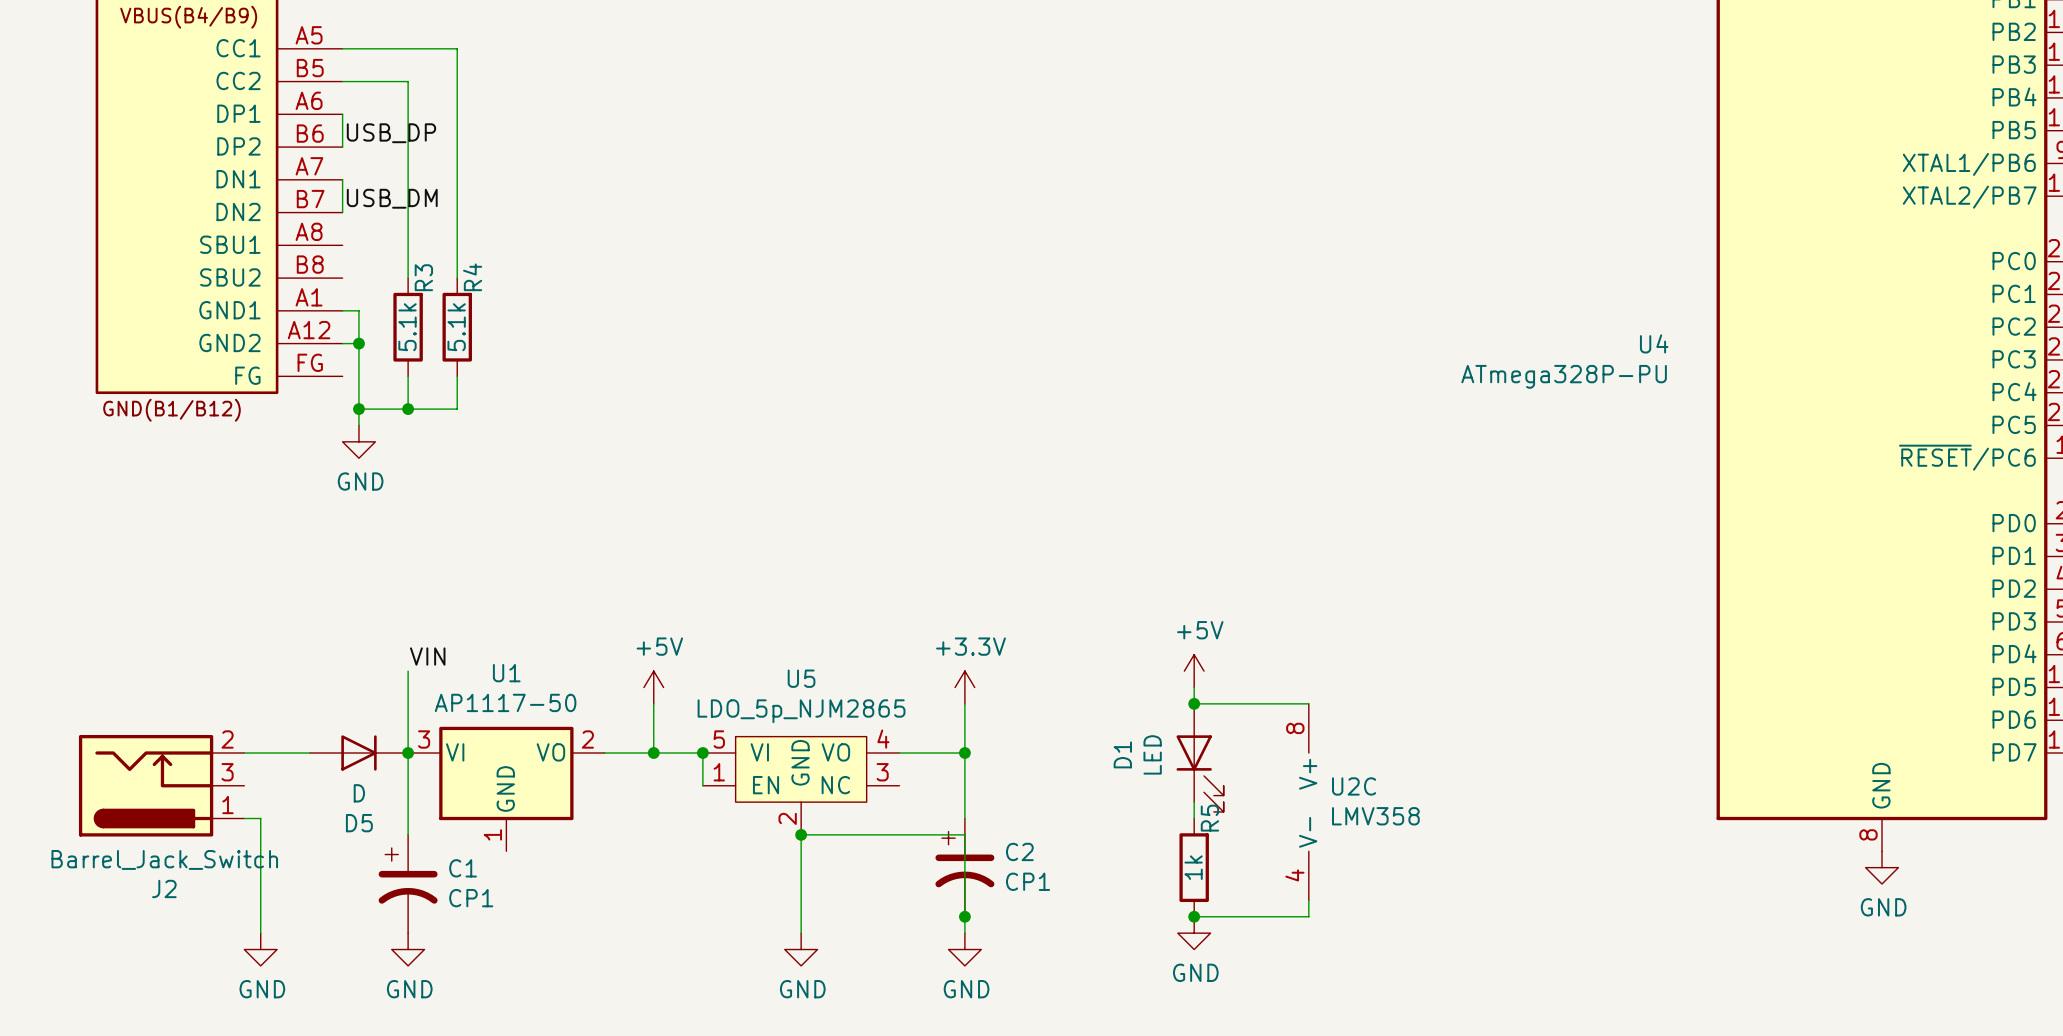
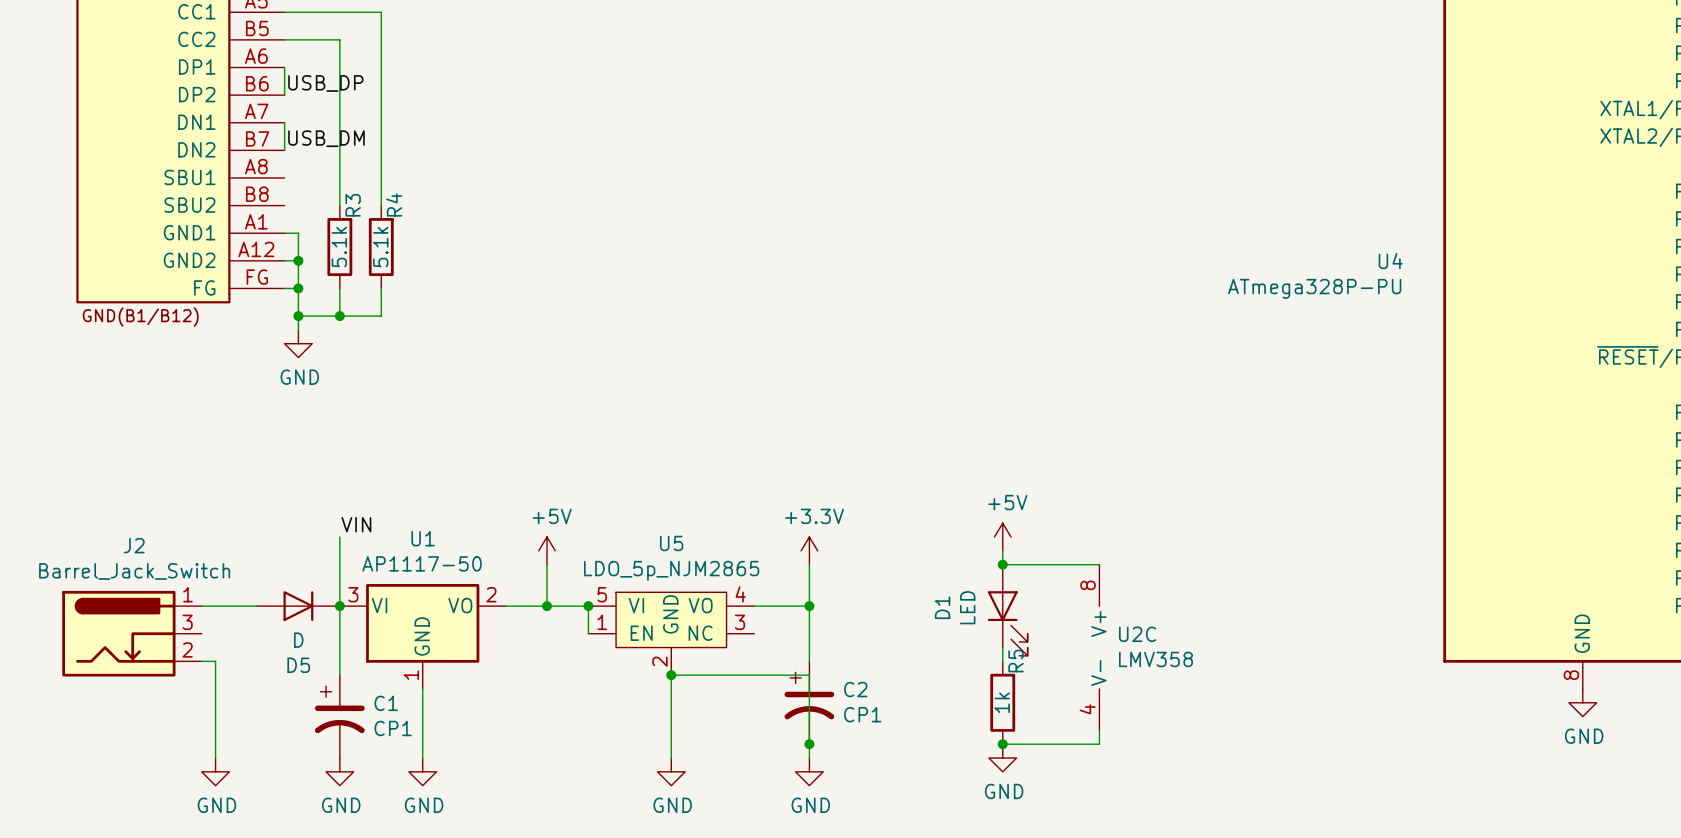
wire: none -> (284, 288) (298, 288)
junction: none -> (298, 288)
J2 flip: as is (146, 785) -> up-down (118, 633)
wire: none -> (422, 688) (422, 758)
power symbol: none -> GND (422, 771)

